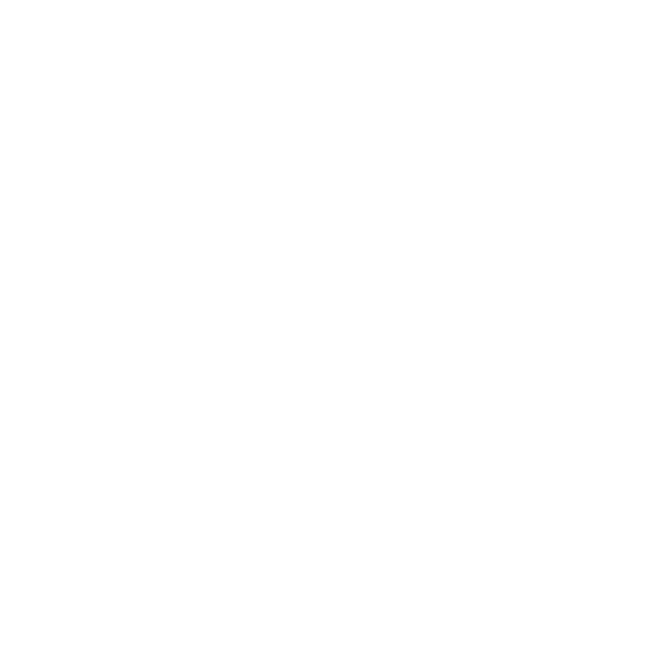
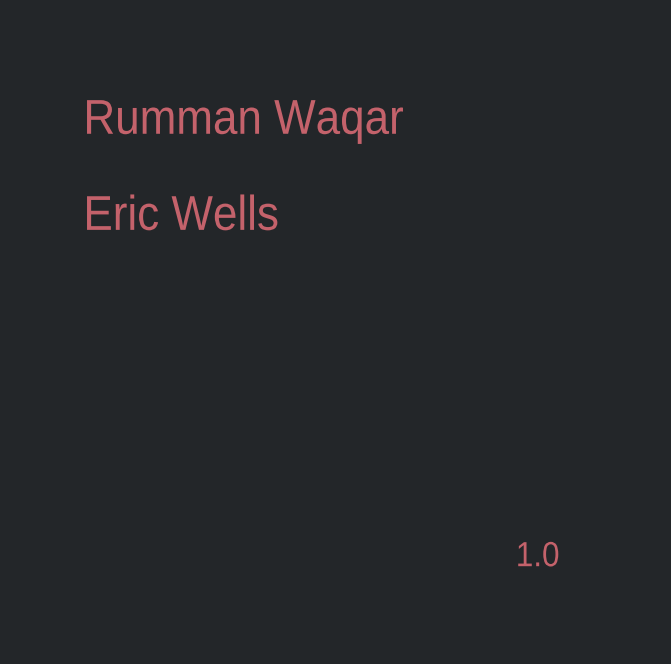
text: none -> Rumman Waqar (245, 122)
text: none -> Eric Wells (182, 212)
text: none -> 1.0 (538, 554)

